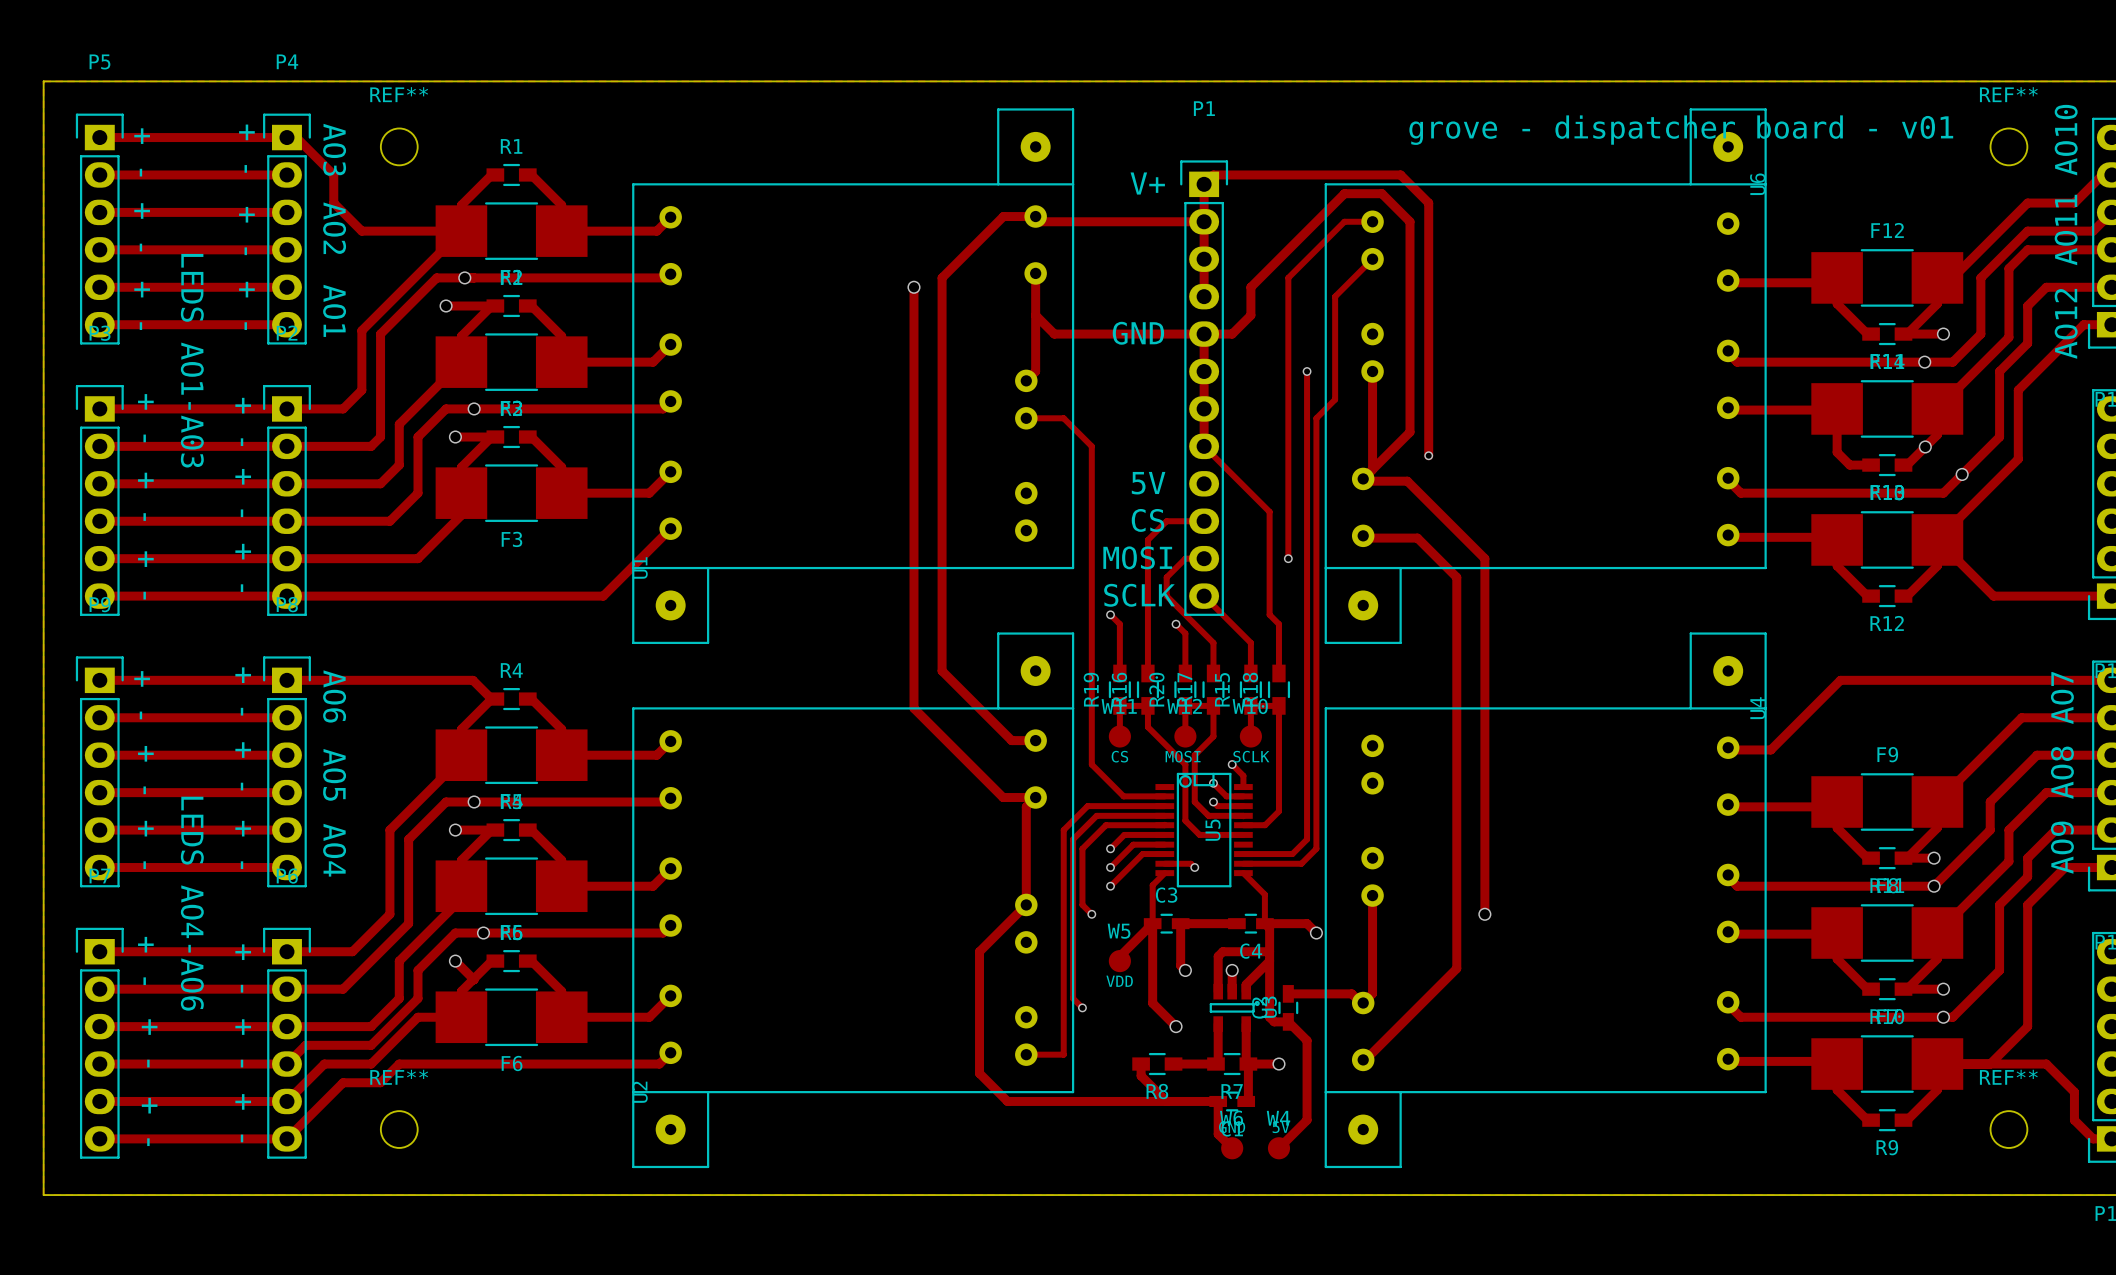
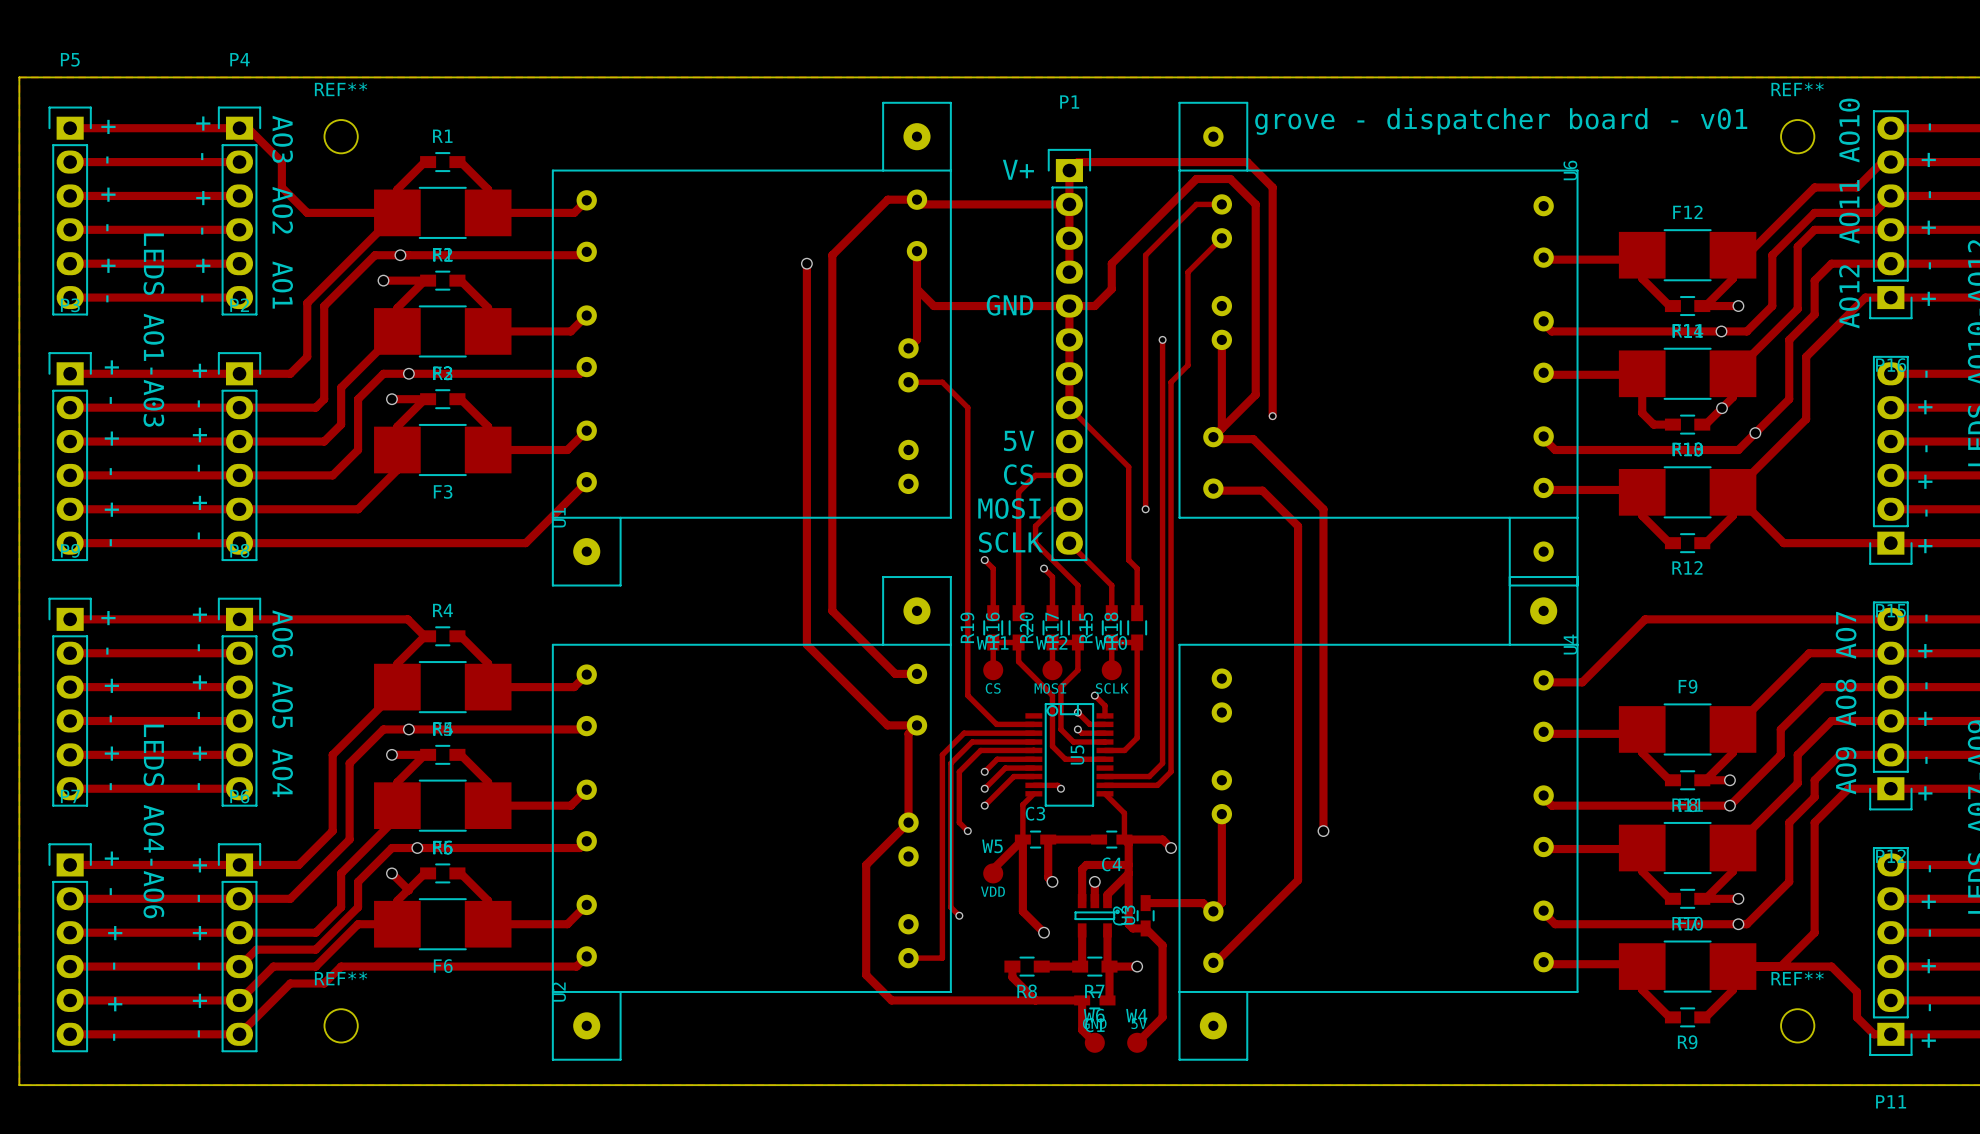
U6 footprint: [1324, 108, 1767, 645] -> [1178, 101, 1579, 587]

